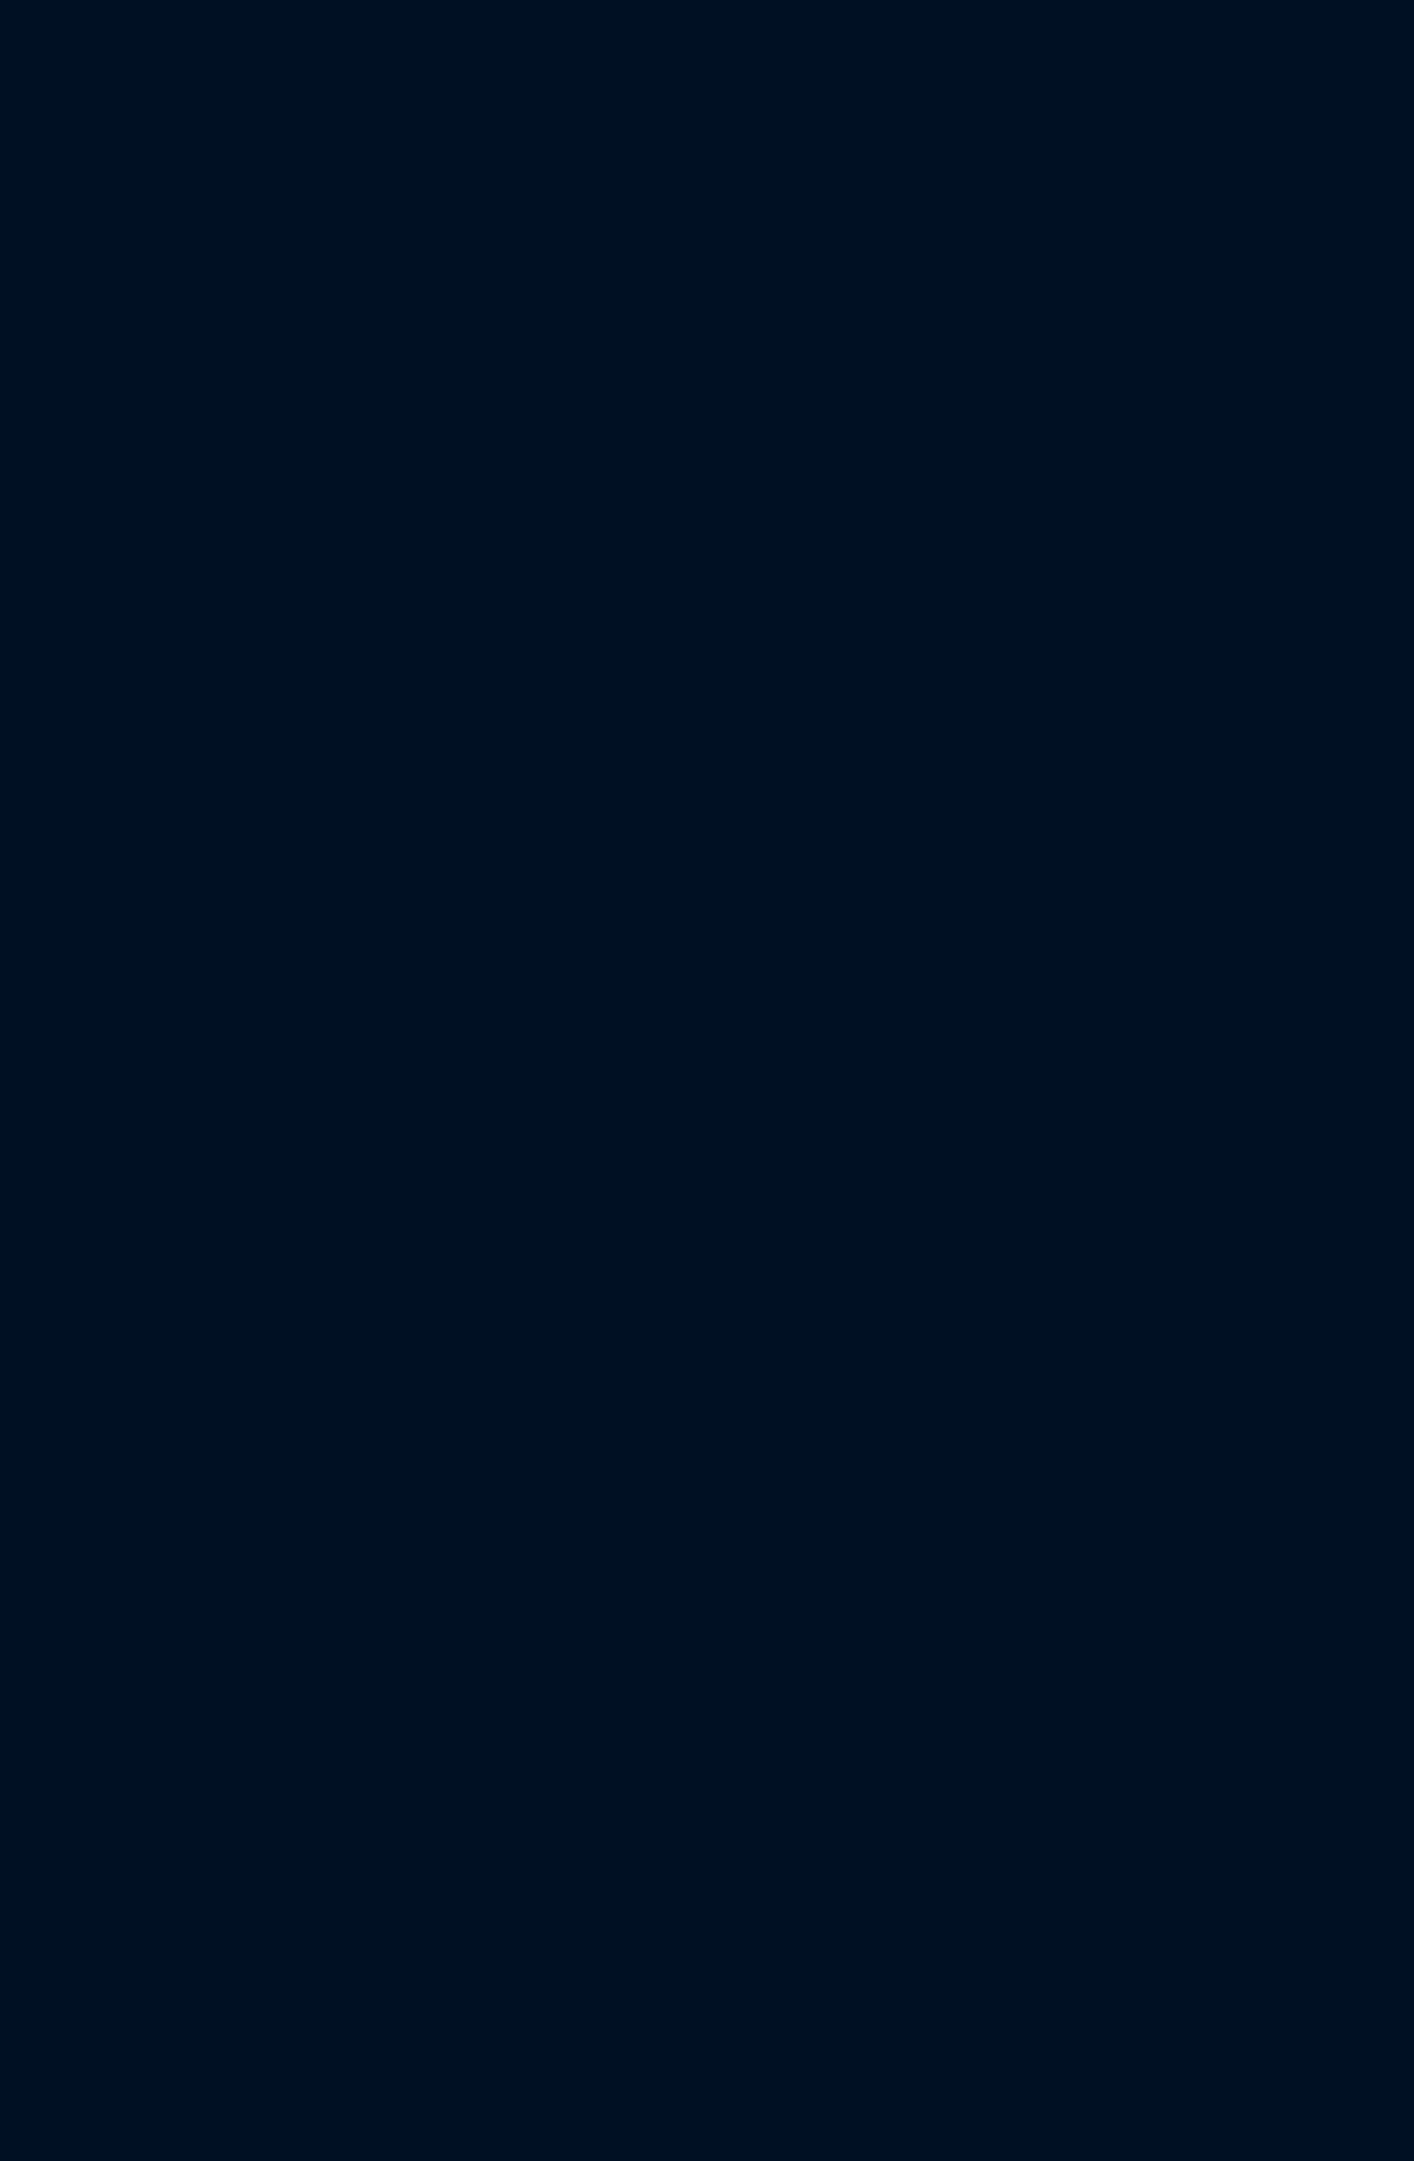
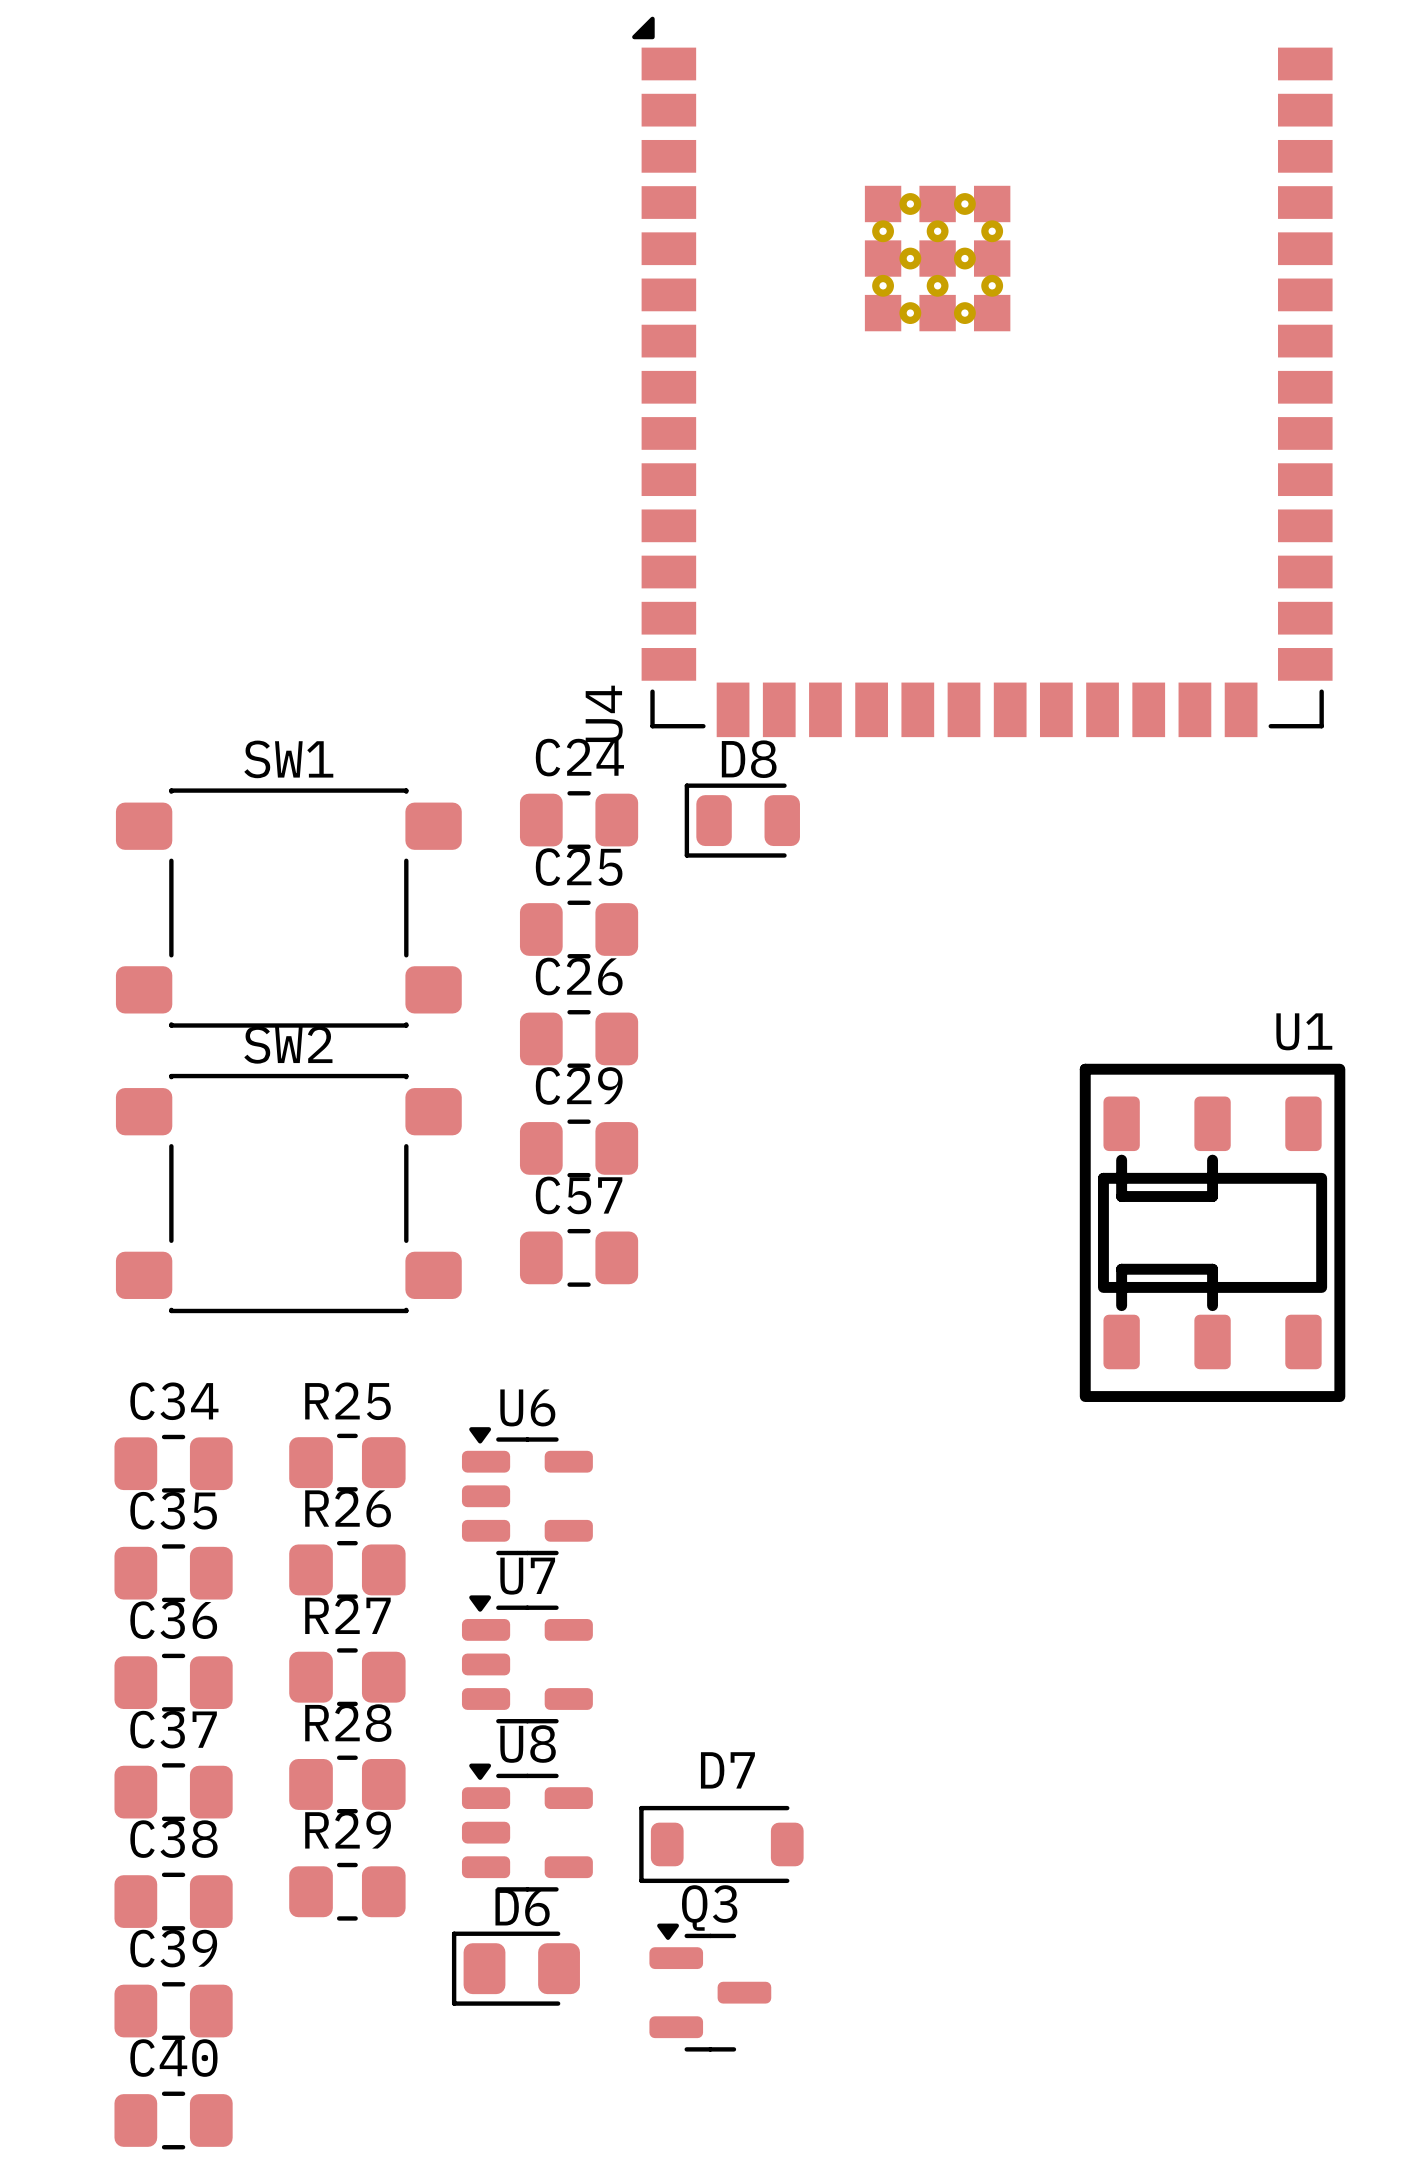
U4: none -> (982, 376)
C24: none -> (579, 820)
D8: none -> (742, 820)
SW1: none -> (288, 908)
C25: none -> (579, 929)
C26: none -> (579, 1038)
C29: none -> (579, 1148)
SW2: none -> (288, 1193)
U1: none -> (1212, 1232)
C57: none -> (579, 1257)
R25: none -> (347, 1462)
C34: none -> (173, 1463)
U6: none -> (527, 1491)
R26: none -> (347, 1569)
C35: none -> (173, 1573)
U7: none -> (527, 1659)
R27: none -> (347, 1677)
C36: none -> (173, 1682)
R28: none -> (347, 1784)
C37: none -> (173, 1792)
U8: none -> (527, 1827)
D7: none -> (721, 1844)
R29: none -> (347, 1891)
C38: none -> (173, 1901)
D6: none -> (515, 1968)
Q3: none -> (710, 1987)
C39: none -> (173, 2011)
C40: none -> (173, 2120)

